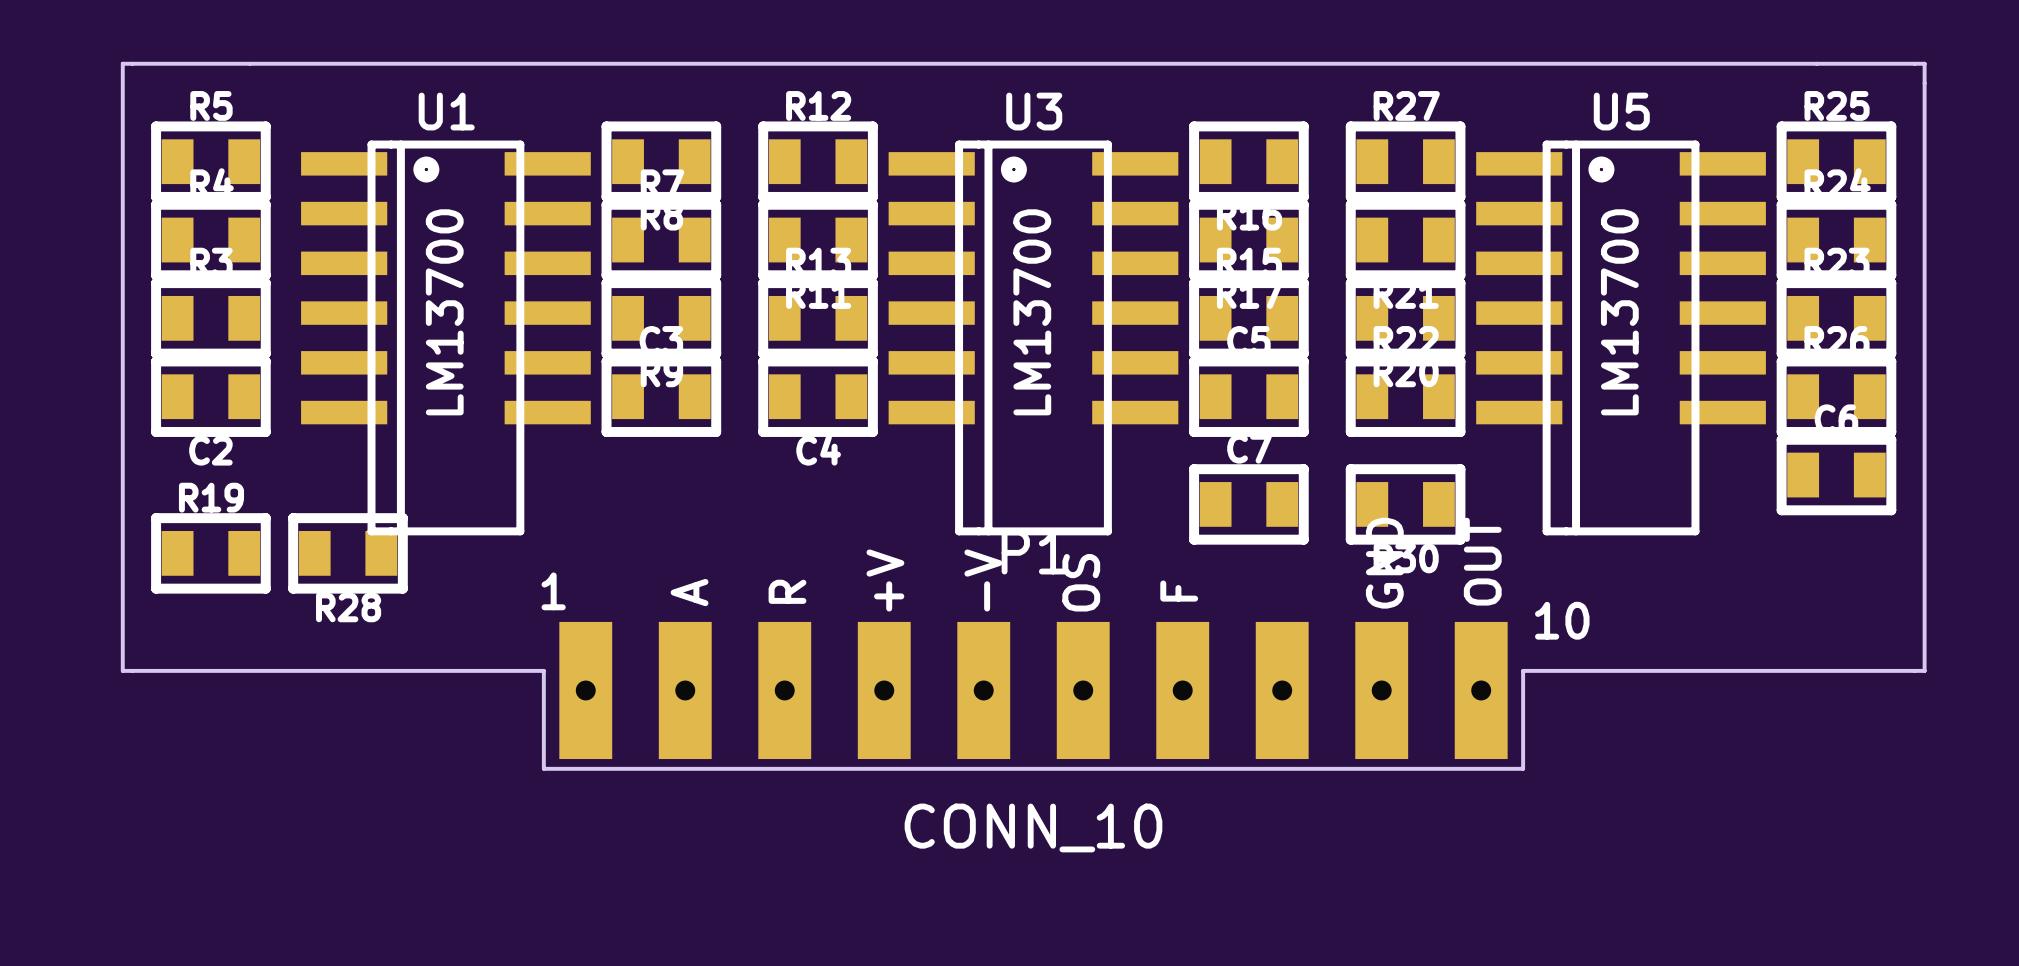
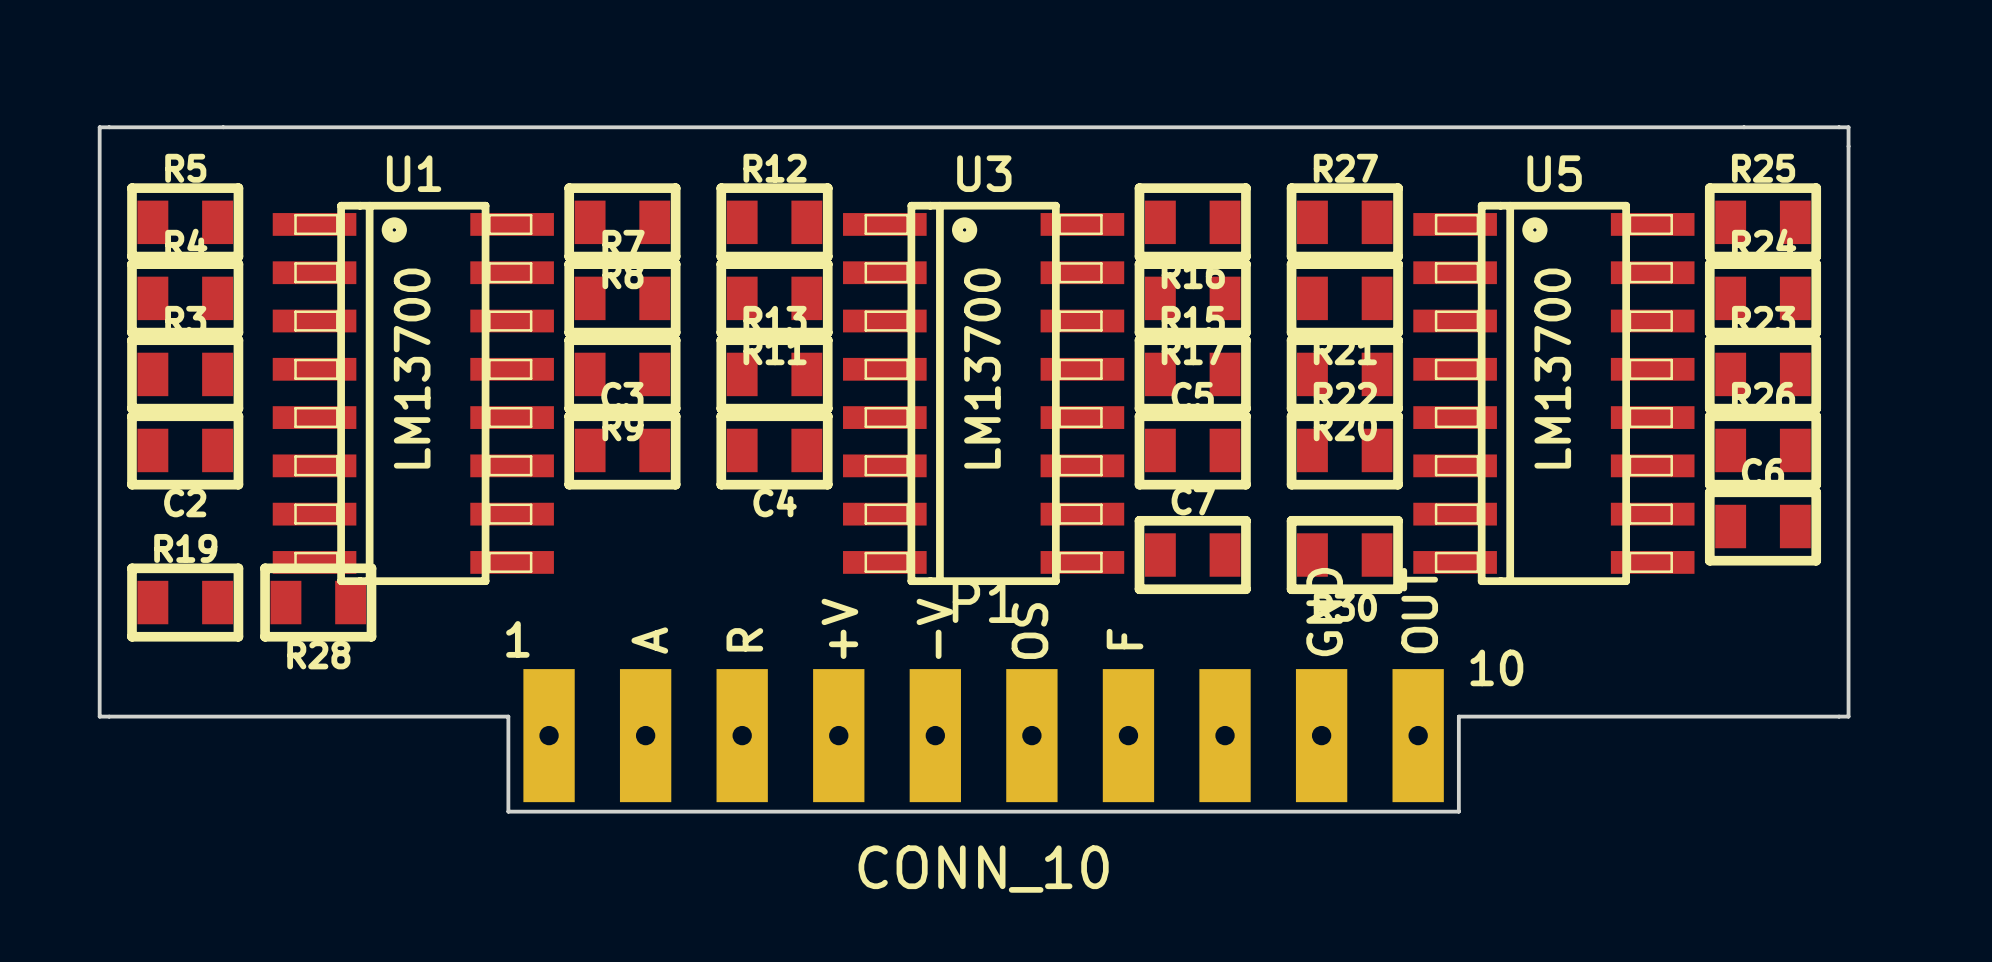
U1 footprint: [301, 140, 591, 536] -> [272, 201, 554, 586]
U3 footprint: [888, 140, 1179, 536] -> [843, 201, 1125, 586]
U5 footprint: [1476, 140, 1766, 536] -> [1413, 201, 1695, 586]

